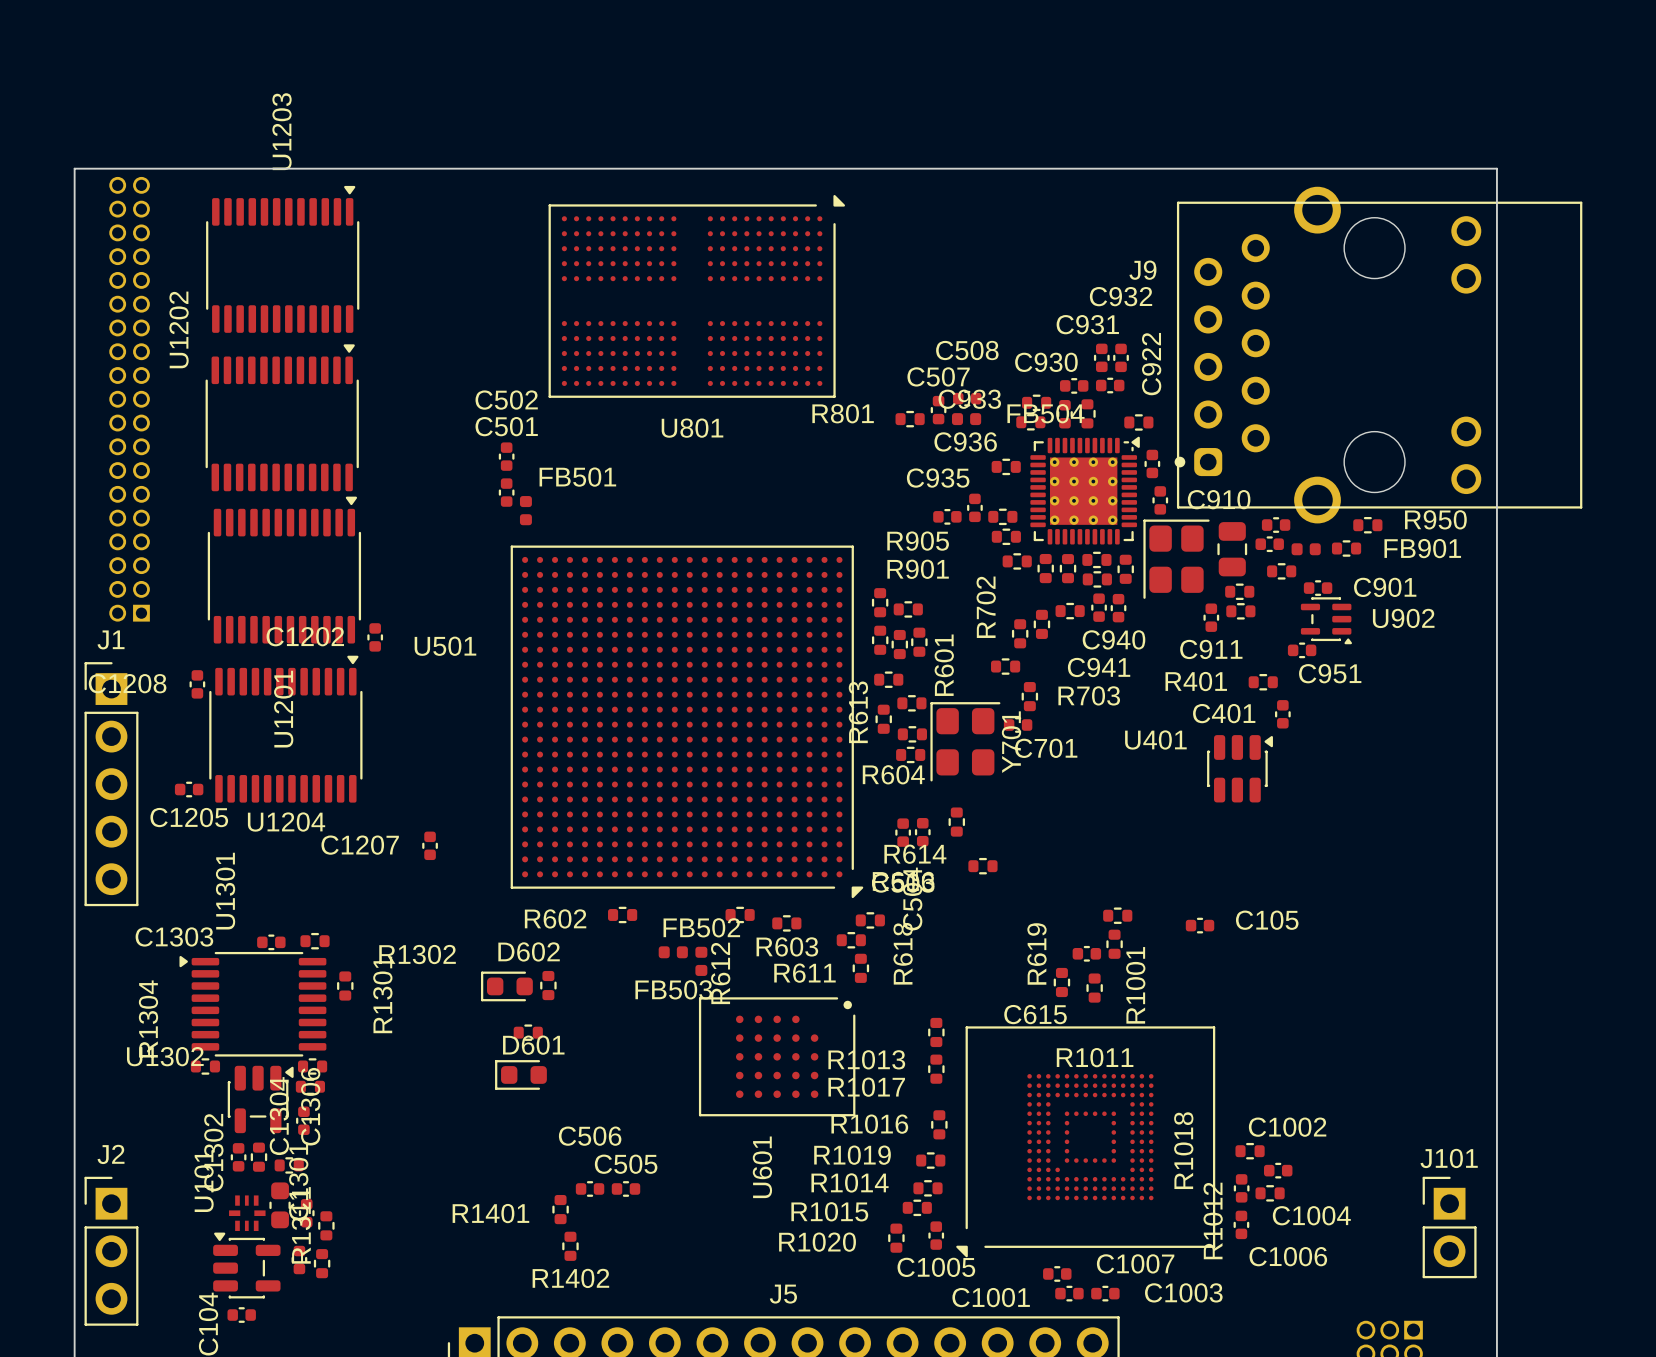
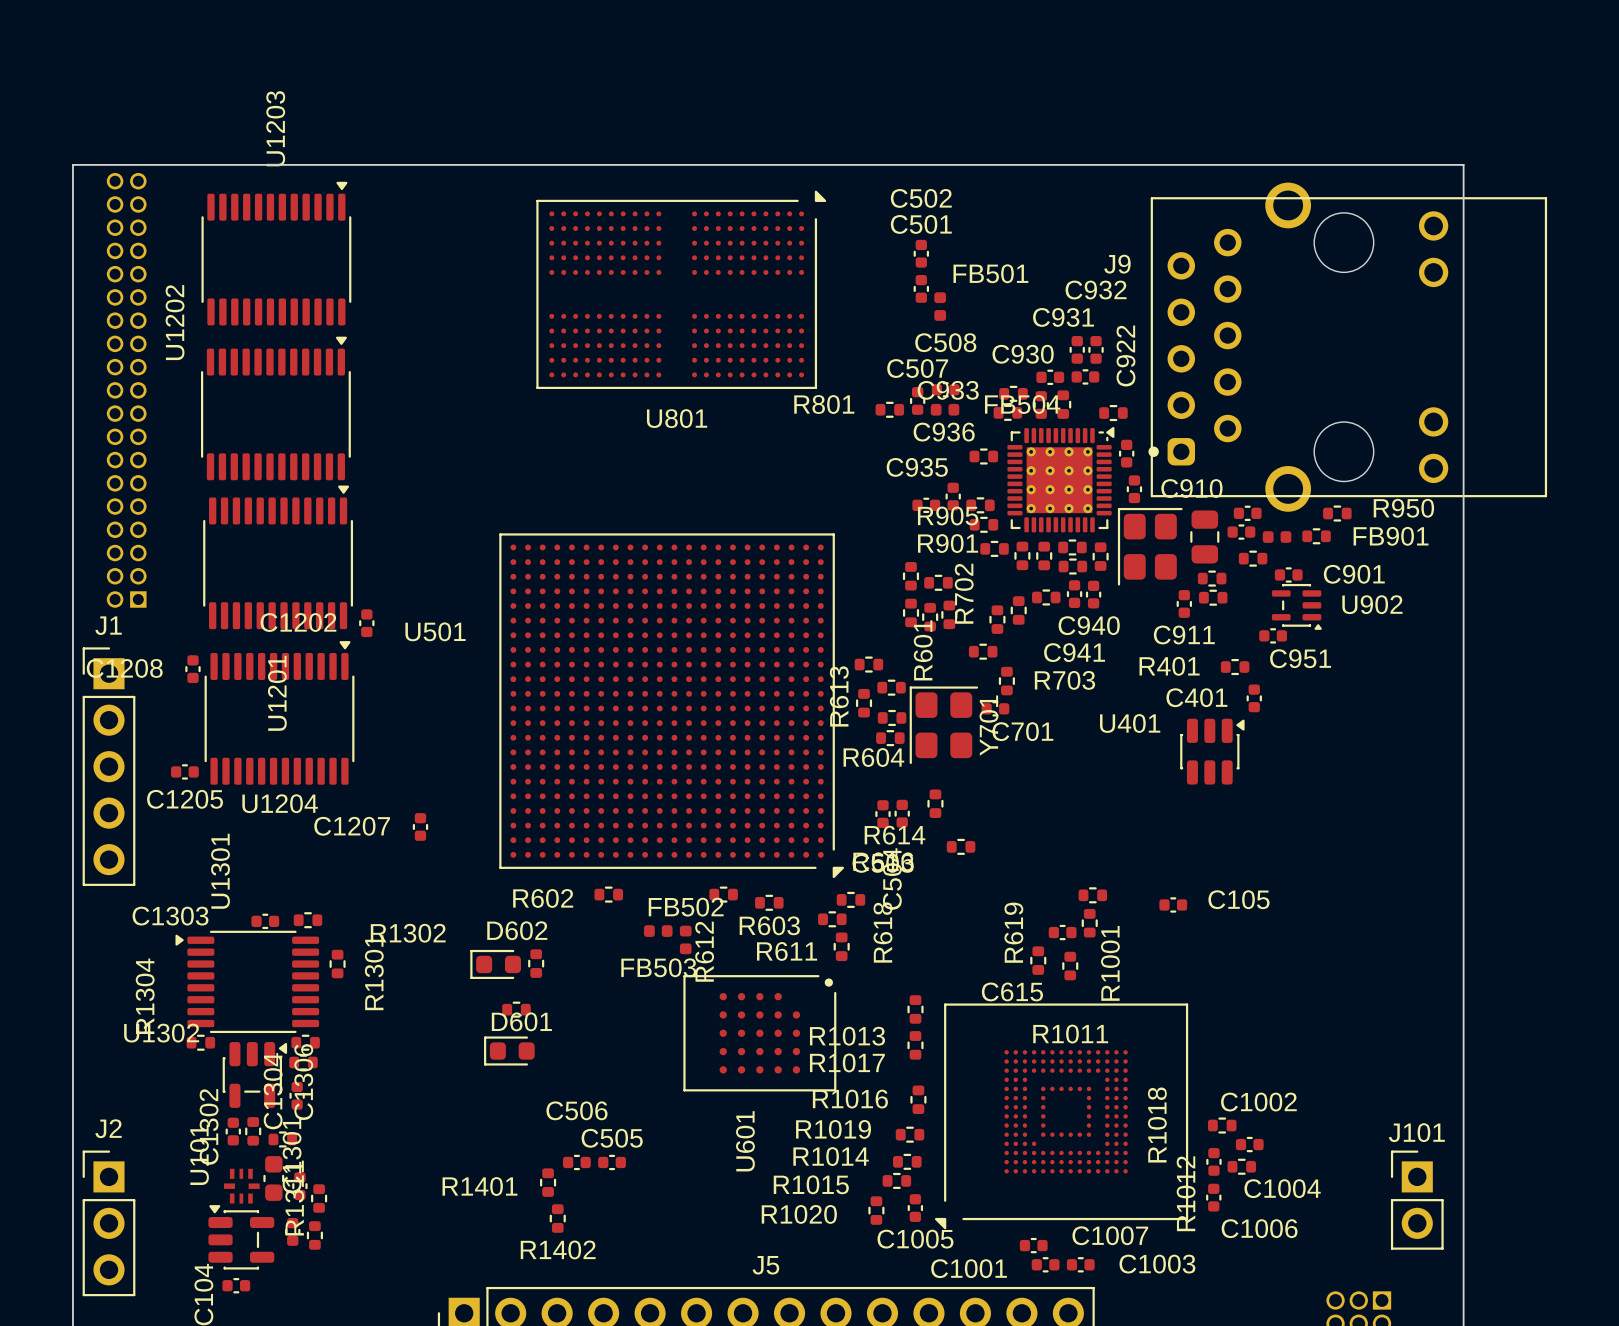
C502 position: (506, 456) -> (921, 253)
C501 position: (506, 492) -> (921, 288)
FB501 position: (525, 510) -> (940, 306)
part: none -> (938, 582)
R905 position: (880, 602) -> (910, 576)
part: (908, 609) -> none
part: none -> (949, 614)
part: none -> (930, 617)
R901 position: (880, 640) -> (911, 612)
part: (919, 642) -> none
part: (899, 644) -> none

